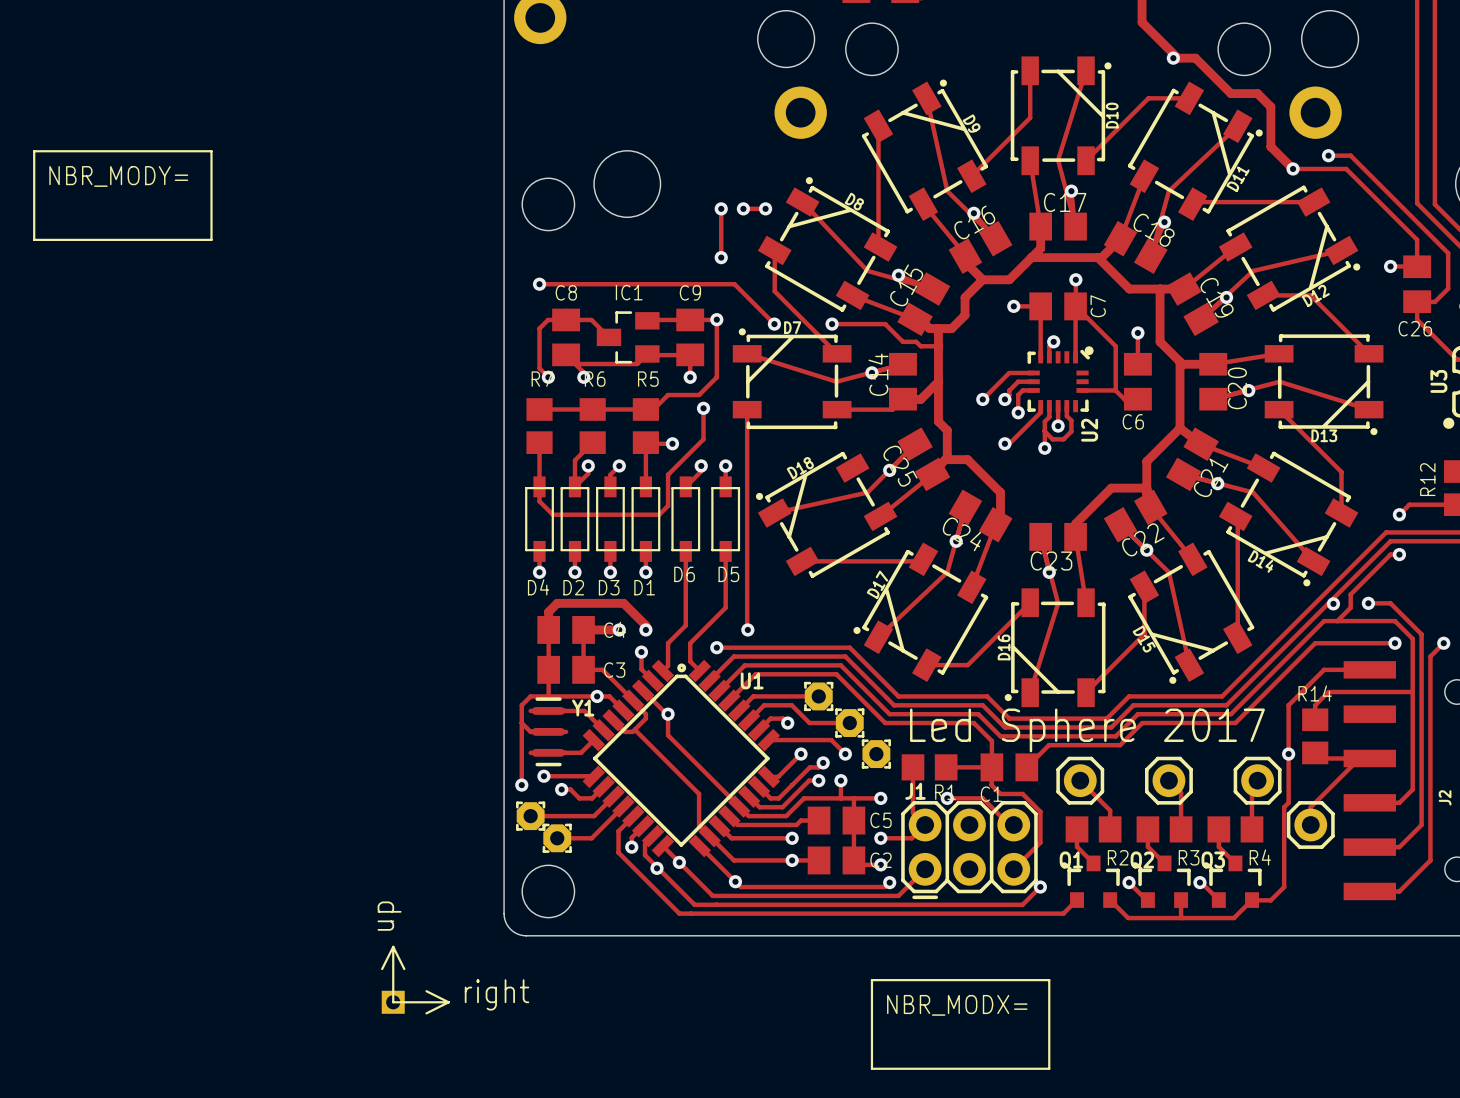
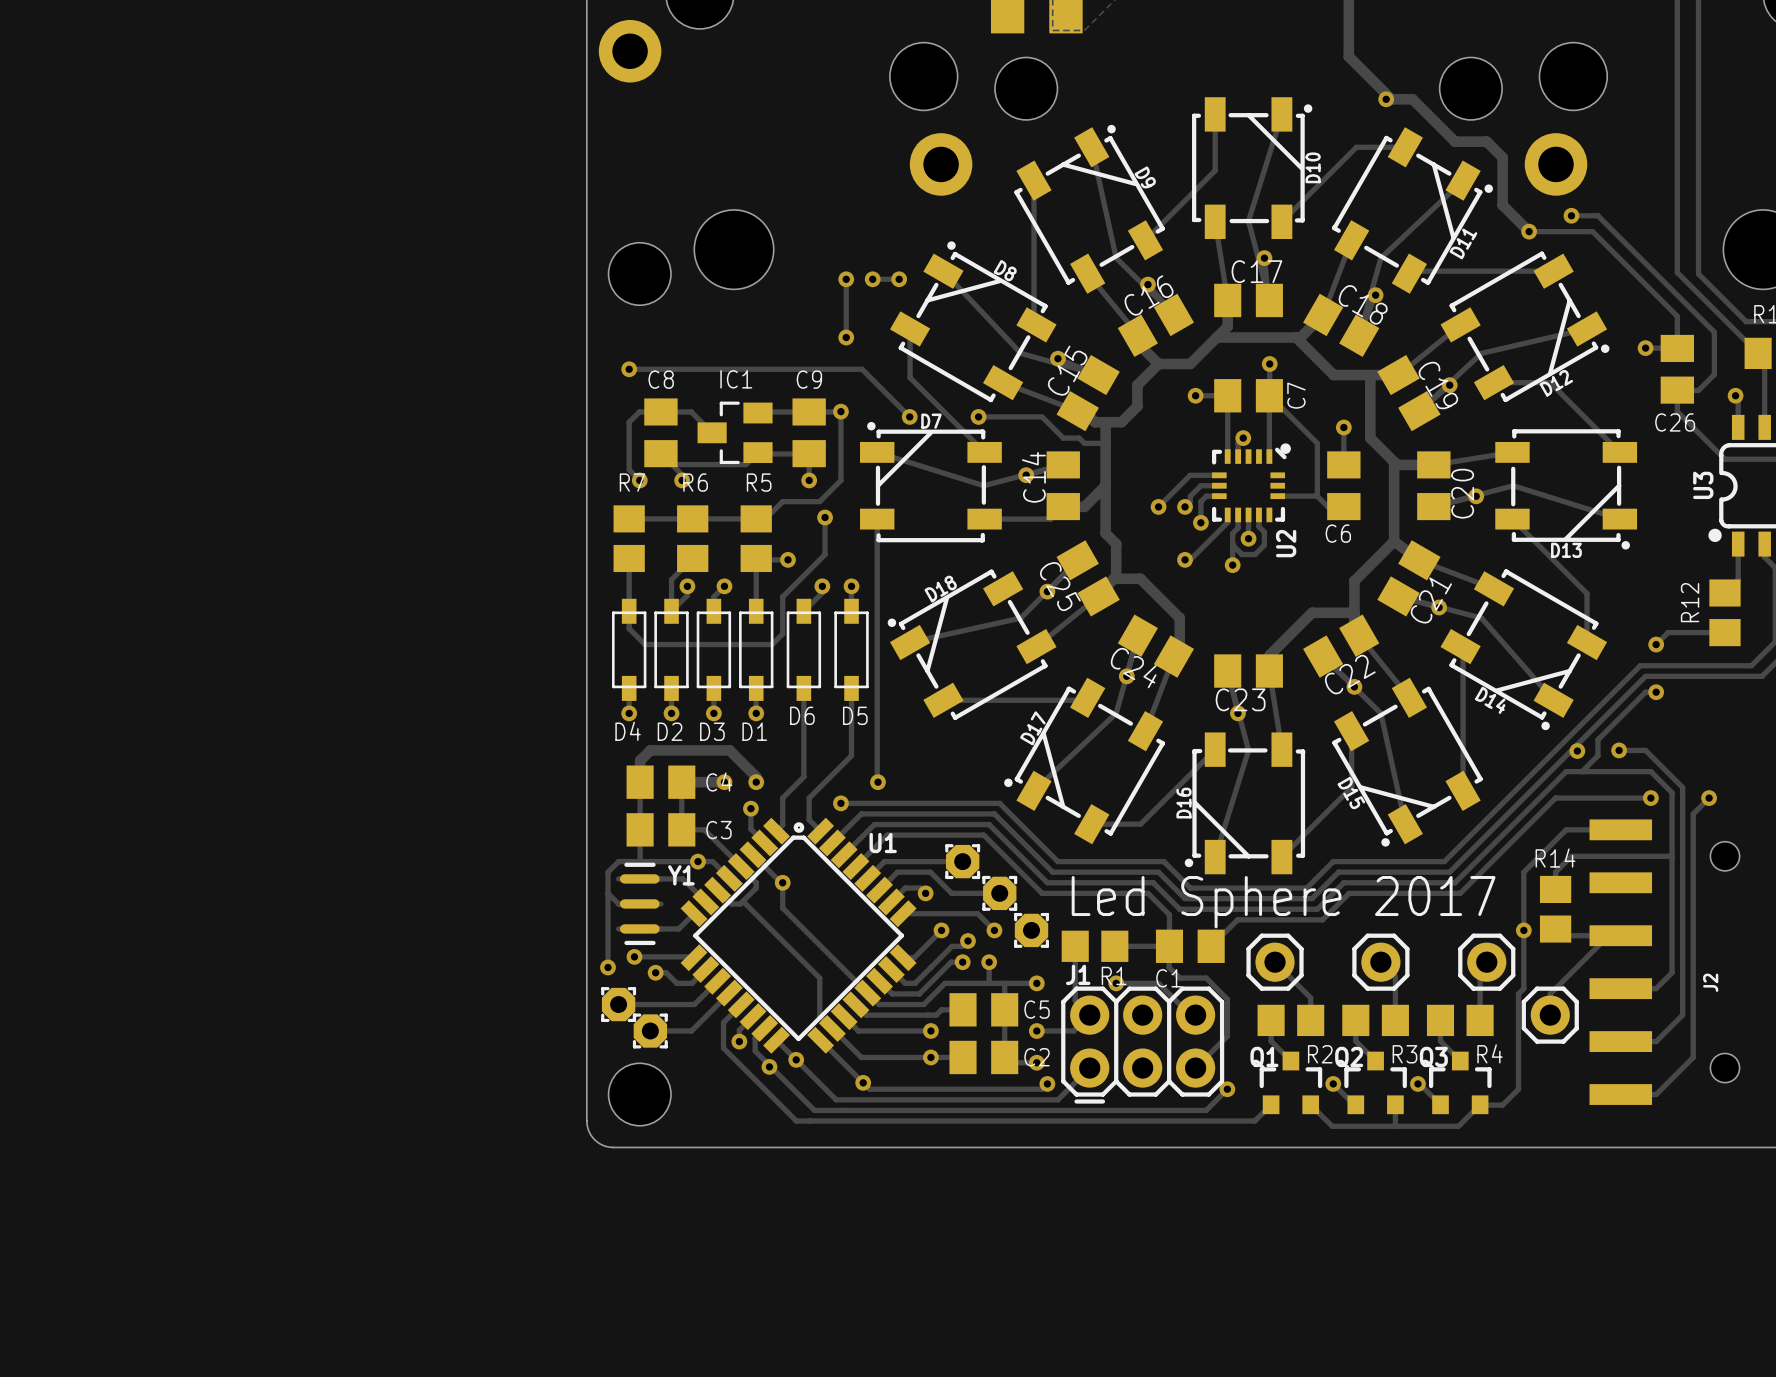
drawing: [33, 150, 213, 242] -> none
drawing: [870, 979, 1051, 1070] -> none
part: (415, 980) -> none

